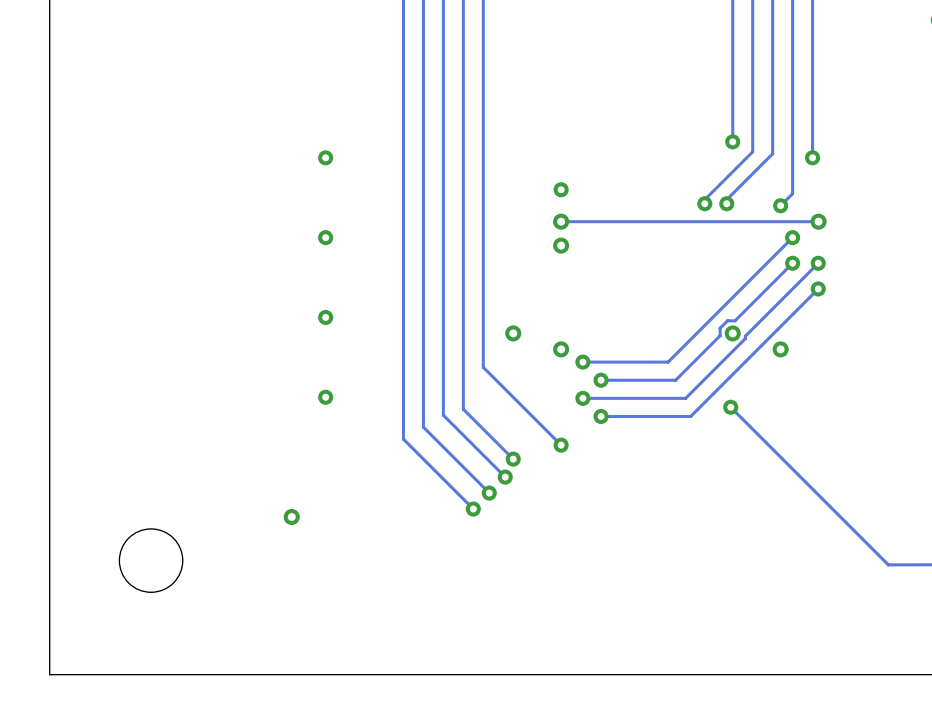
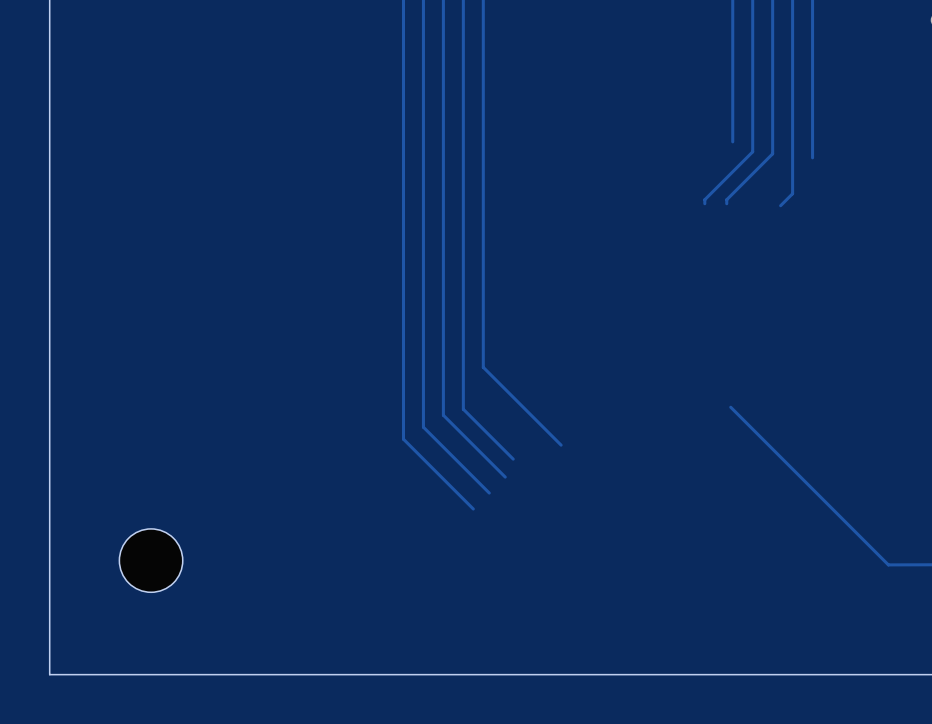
via: (732, 141) -> none
via: (325, 157) -> none
via: (812, 157) -> none
via: (561, 189) -> none
via: (704, 203) -> none
via: (726, 203) -> none
via: (780, 205) -> none
via: (561, 221) -> none
track: (818, 221) (561, 221) -> none
via: (818, 221) -> none
via: (325, 237) -> none
track: (792, 237) (668, 362) (582, 362) -> none
via: (792, 237) -> none
via: (561, 245) -> none
track: (792, 263) (735, 320) (727, 320) (720, 328) (720, 335) (675, 380) (601, 380) -> none
via: (792, 263) -> none
track: (818, 263) (685, 398) (582, 398) -> none
via: (818, 263) -> none
track: (818, 288) (690, 416) (601, 416) -> none
via: (818, 288) -> none
via: (325, 317) -> none
via: (513, 333) -> none
via: (732, 333) -> none
via: (561, 349) -> none
via: (780, 349) -> none
via: (582, 362) -> none
via: (601, 380) -> none
via: (325, 397) -> none
via: (582, 398) -> none
via: (730, 407) -> none
via: (601, 416) -> none
via: (561, 445) -> none
via: (513, 459) -> none
via: (505, 477) -> none
via: (489, 493) -> none
via: (473, 509) -> none
via: (291, 517) -> none

